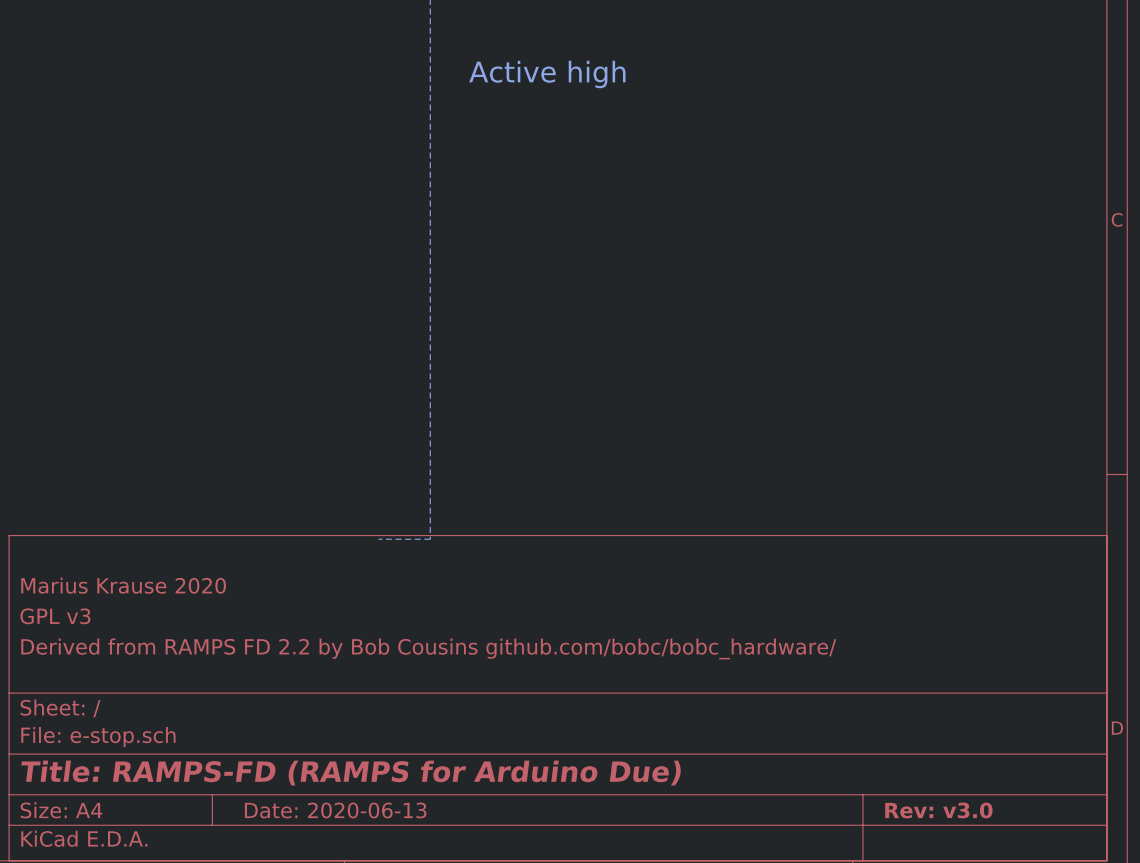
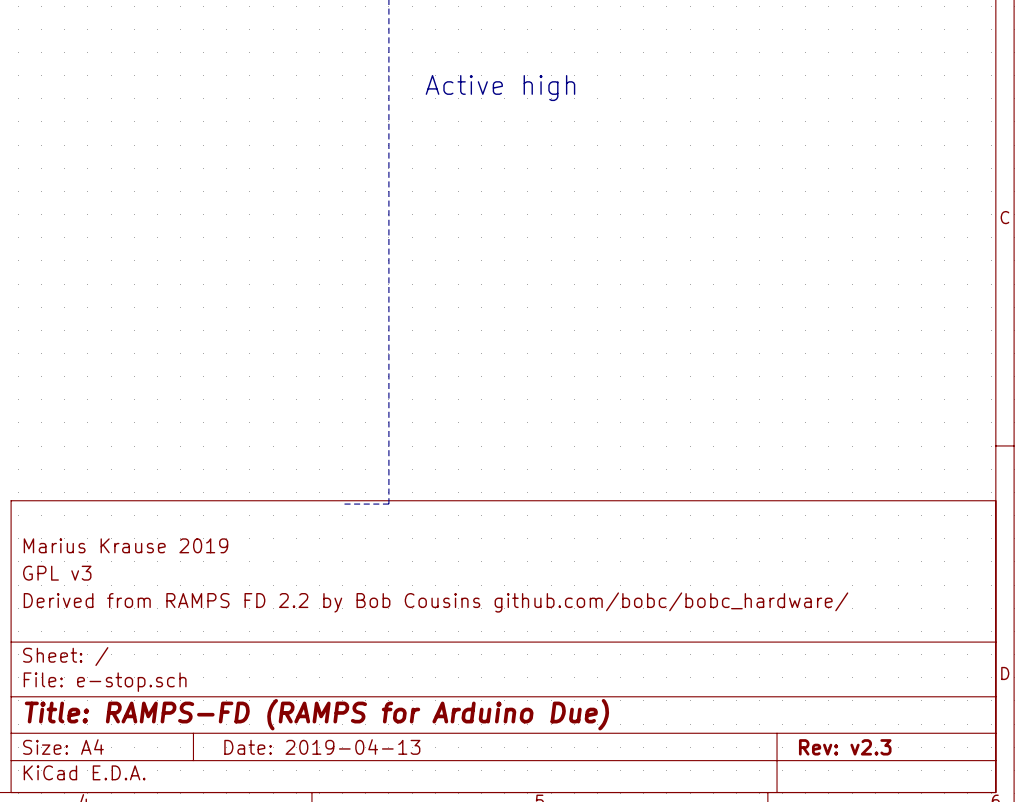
title block: Marius Krause 2020 (123, 585) -> Marius Krause 2019 (125, 545)
title block: Date: 2020-06-13 (335, 810) -> Date: 2019-04-13 (322, 747)
title block: Rev: v3.0 (938, 810) -> Rev: v2.3 (845, 747)

